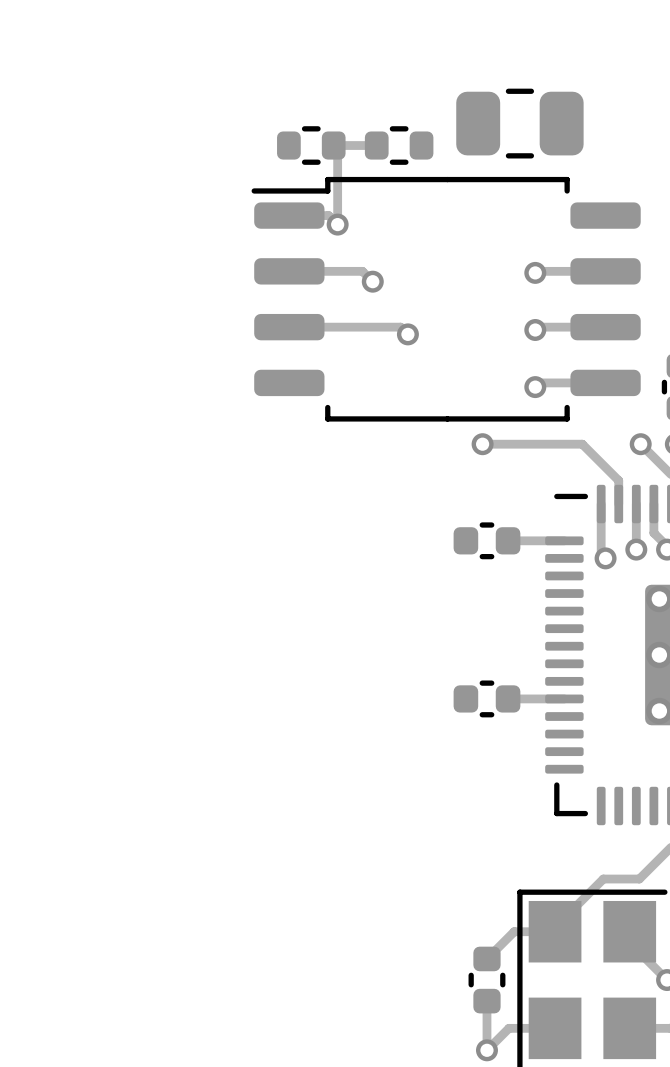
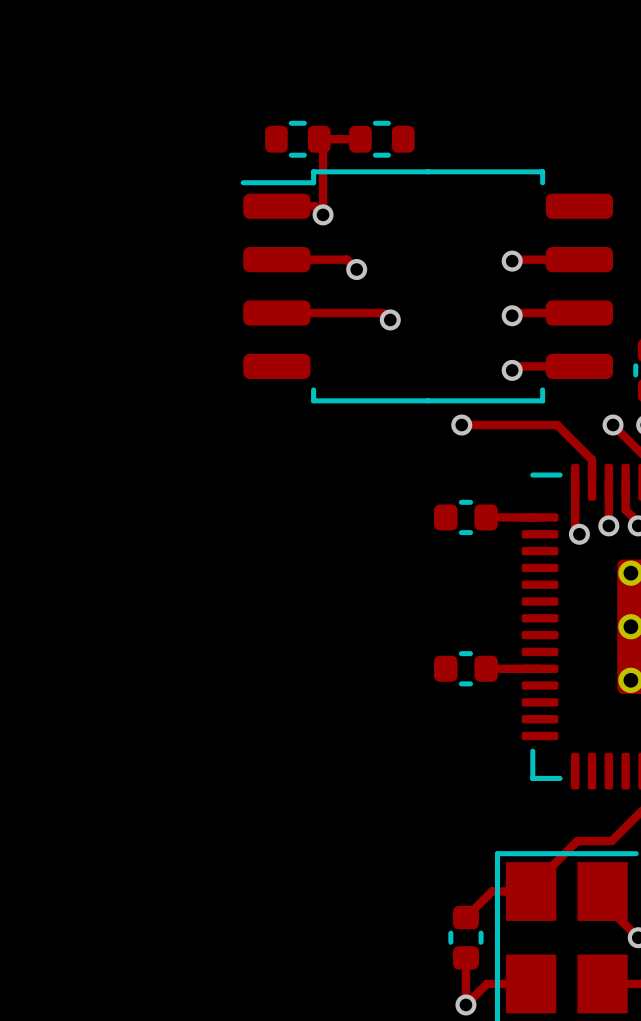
part: (519, 123) -> none

